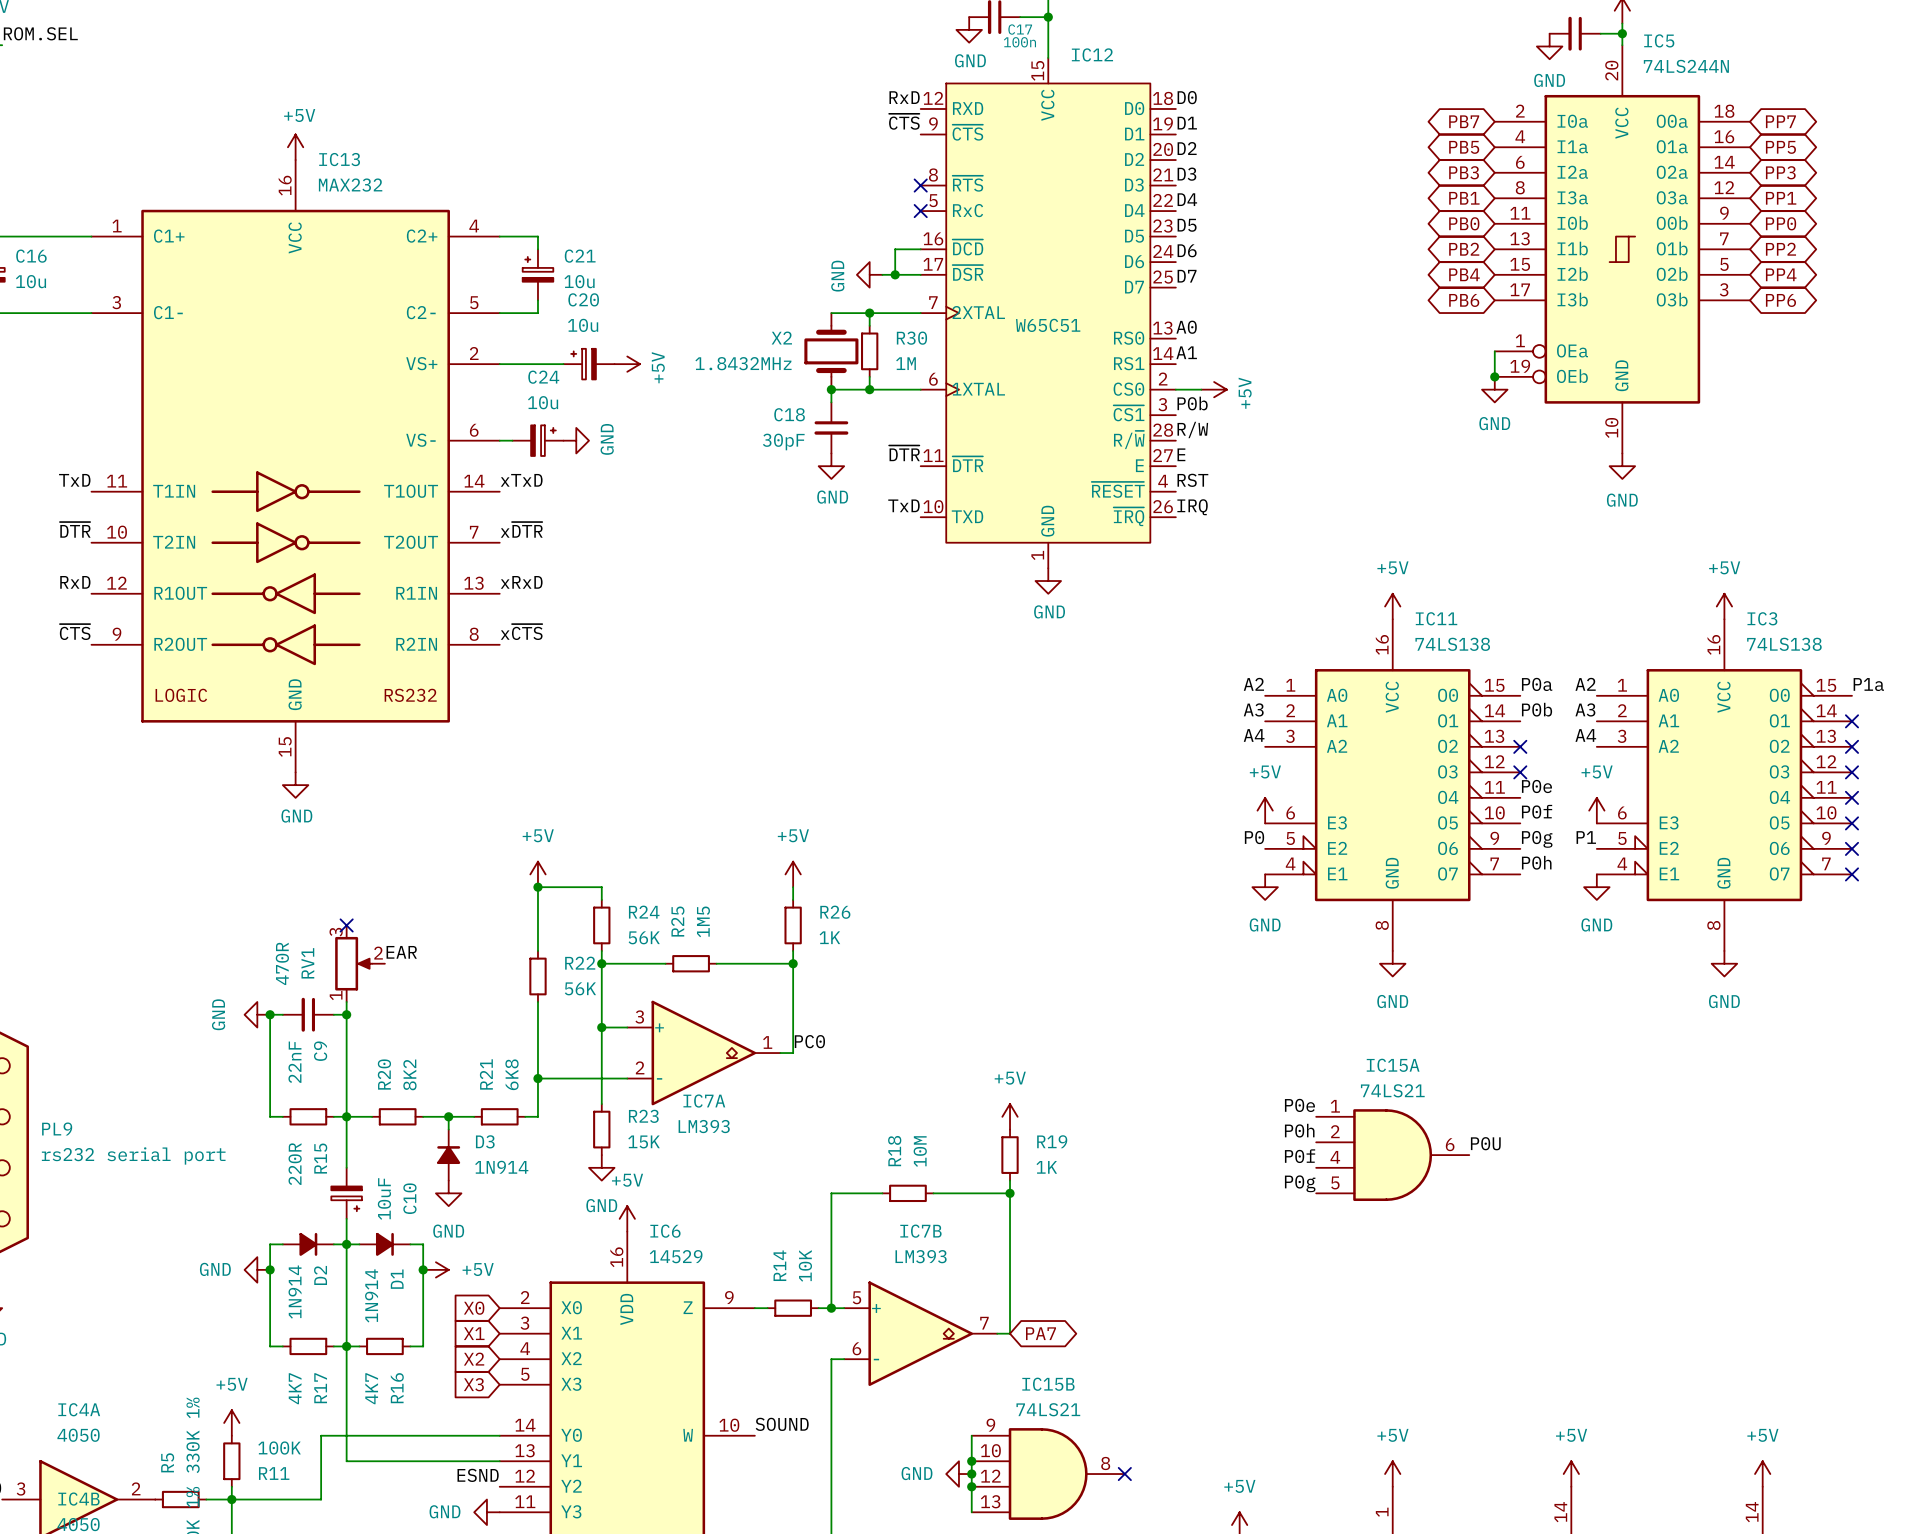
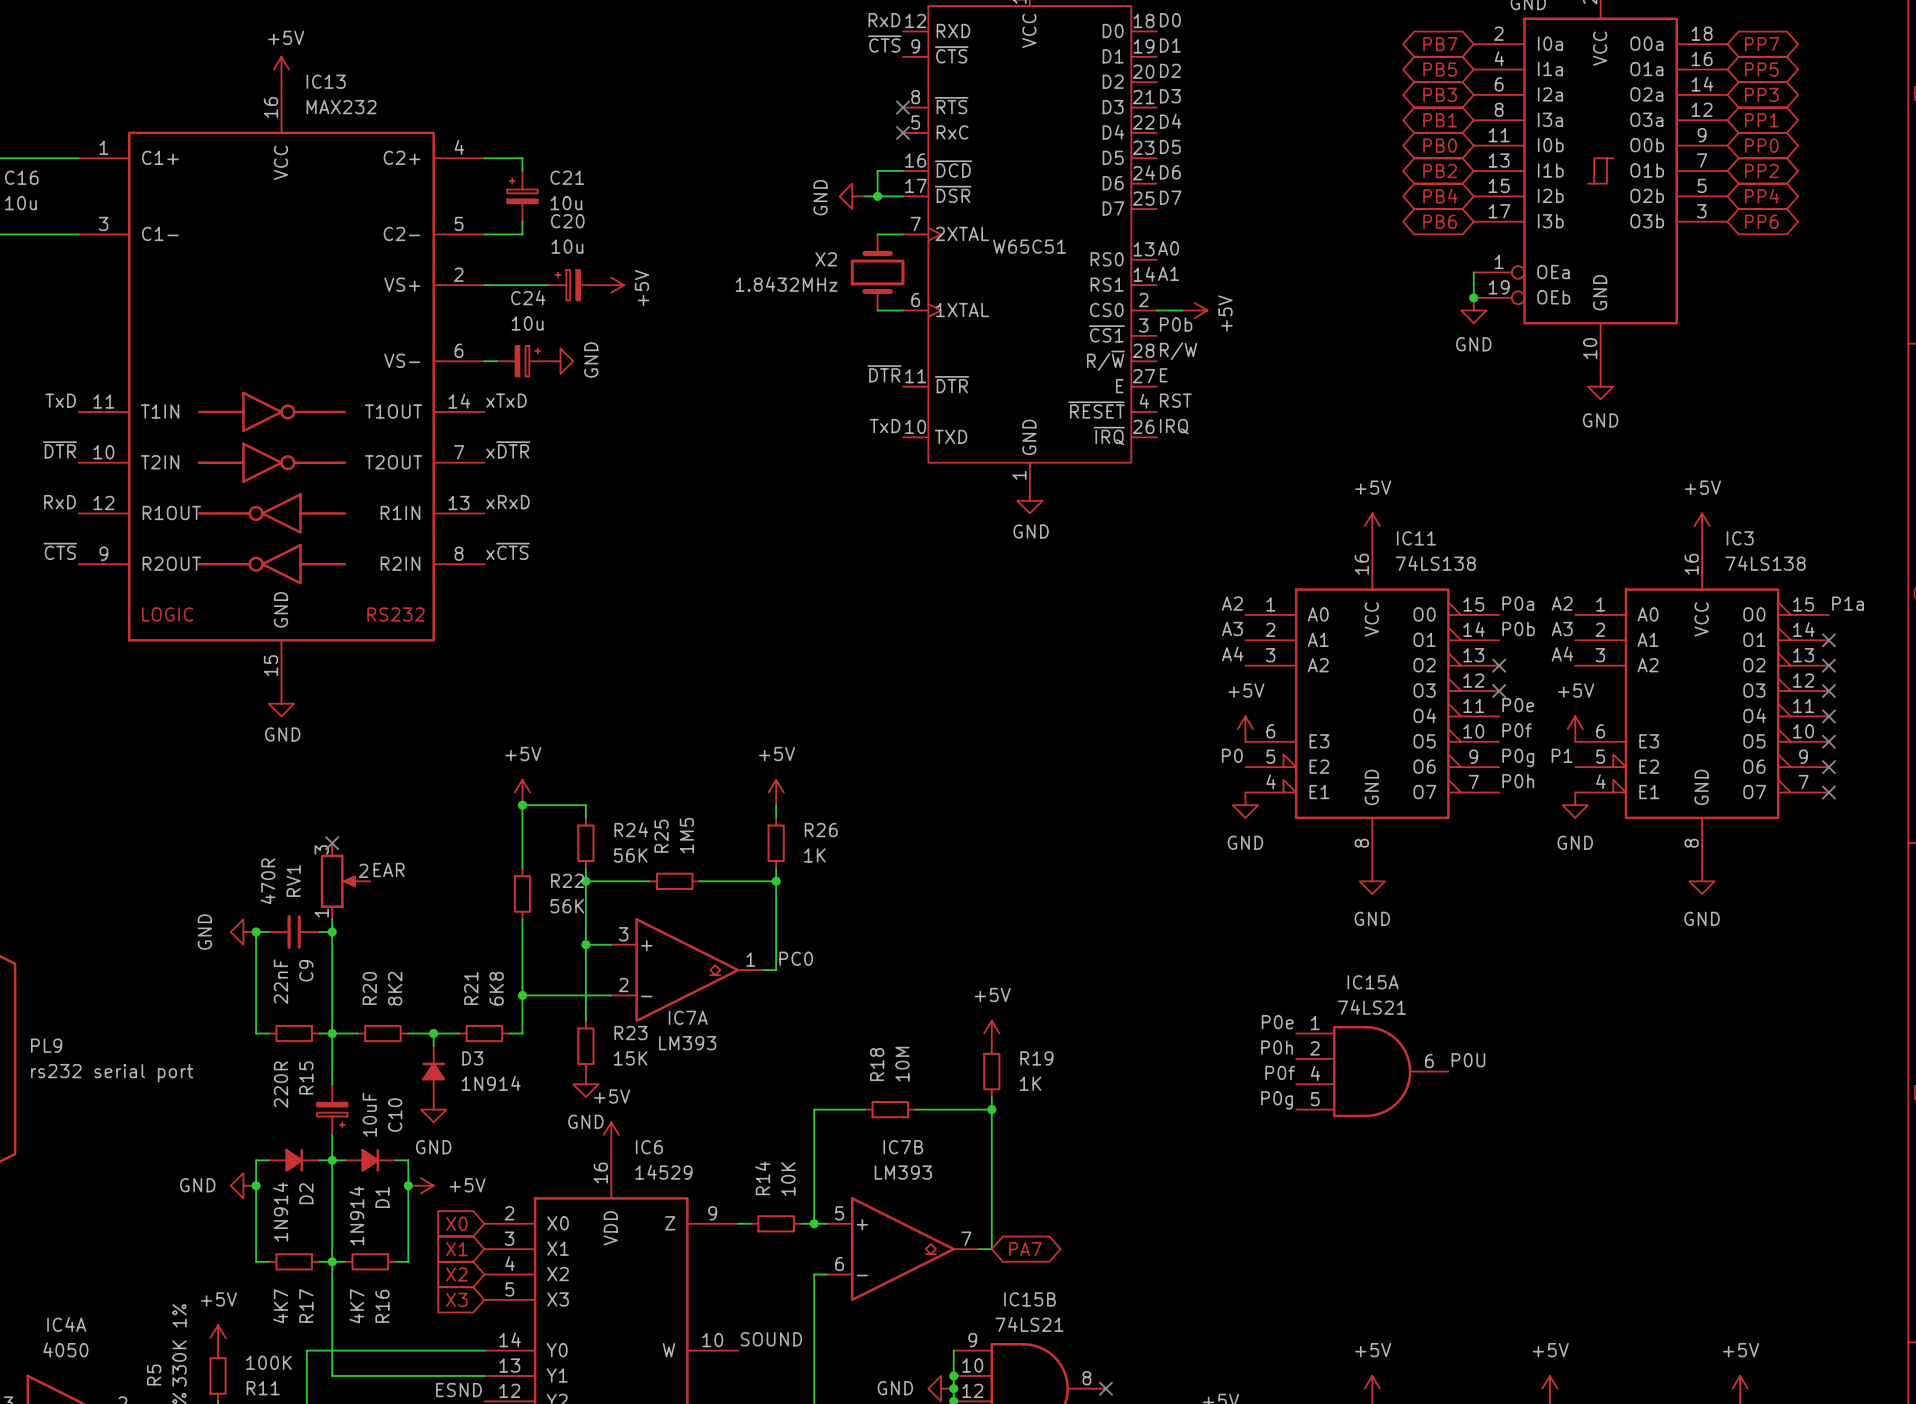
wire: (831, 313) (895, 313) -> none
wire: (869, 313) (869, 325) -> none
junction: (869, 313) -> none
X2 position: (831, 351) -> (877, 272)
R30: 1M (869, 351) -> none
wire: (869, 376) (869, 389) -> none
junction: (831, 389) -> none
junction: (869, 389) -> none
wire: (895, 389) (831, 389) (831, 402) -> none
C18: 30pF (831, 427) -> none
power symbol: GND (831, 466) -> none

